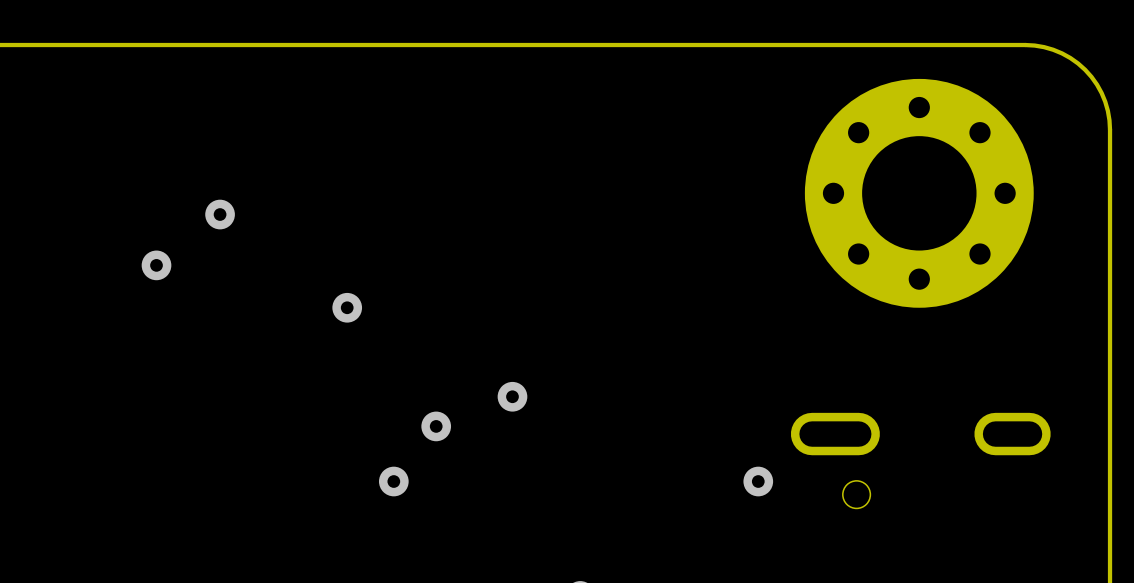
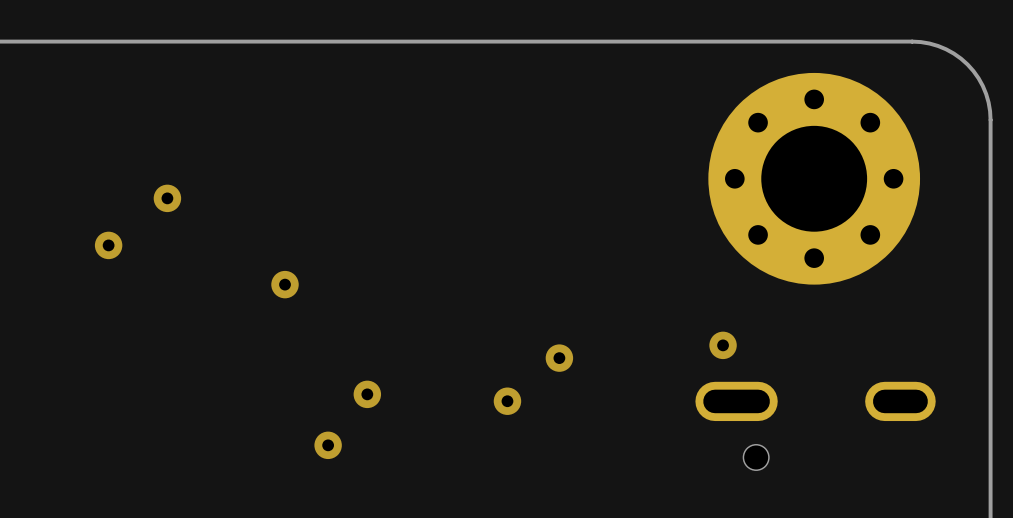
via: none -> (723, 345)
via: none -> (559, 358)
via: (512, 396) -> none
via: none -> (507, 401)
via: (758, 481) -> none

